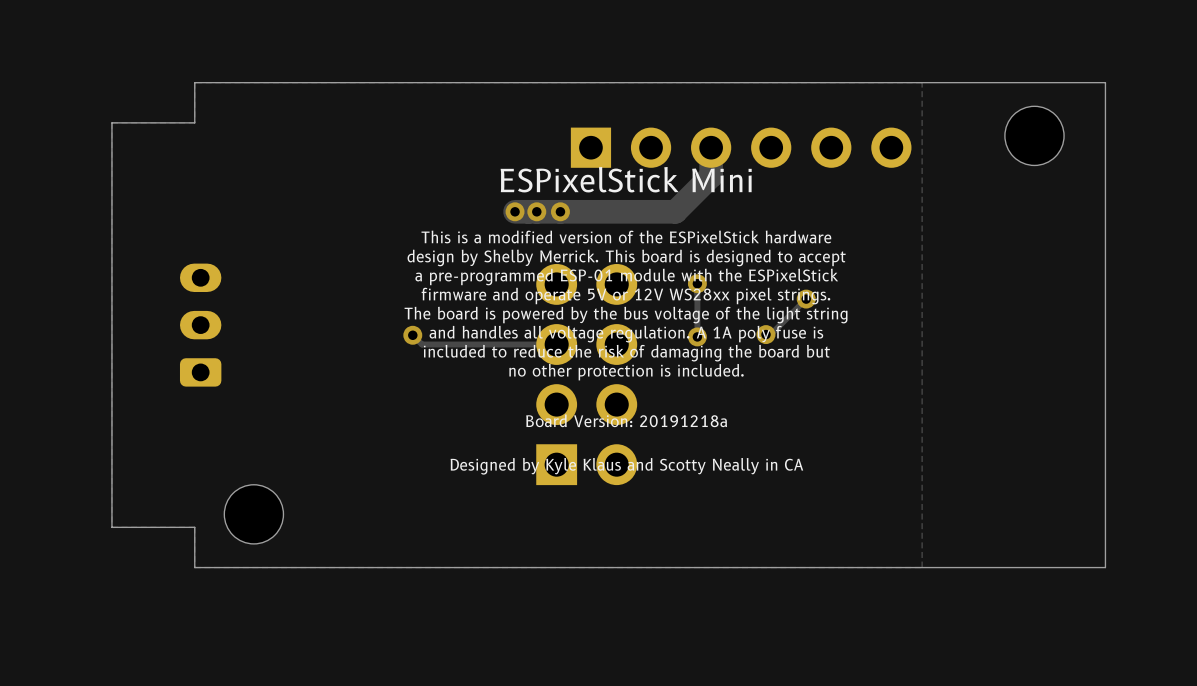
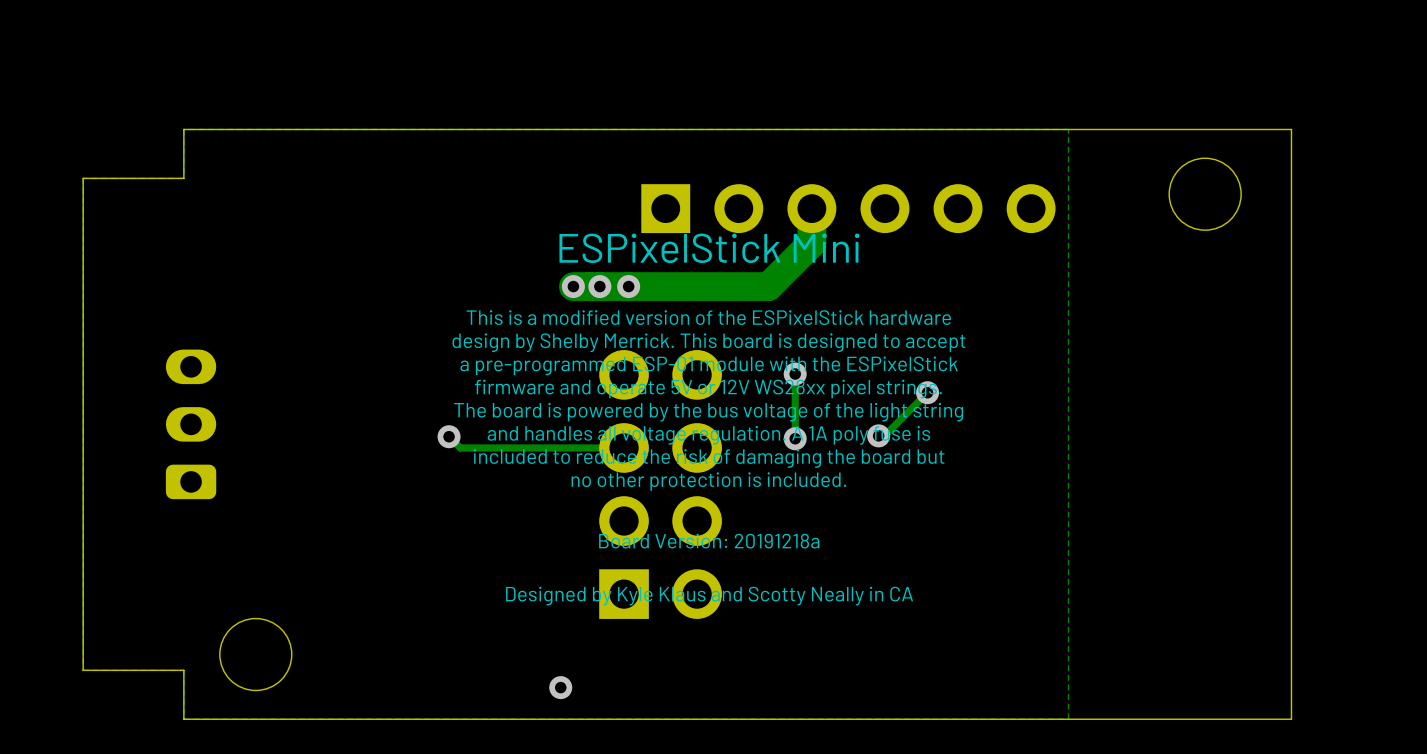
via: none -> (560, 687)

